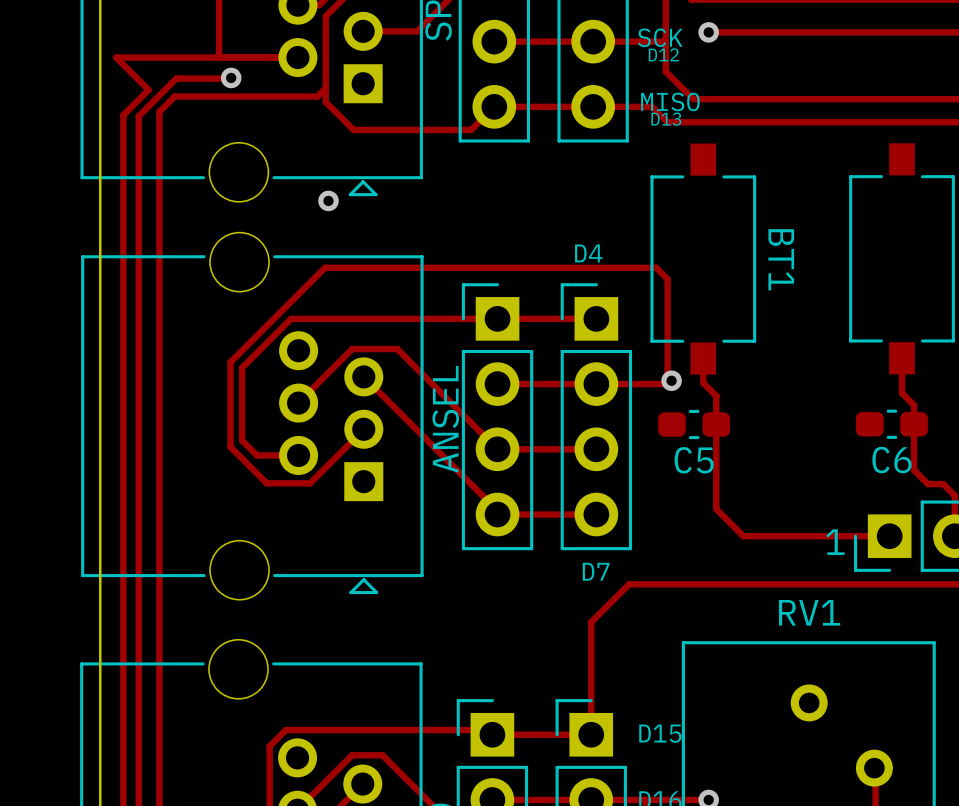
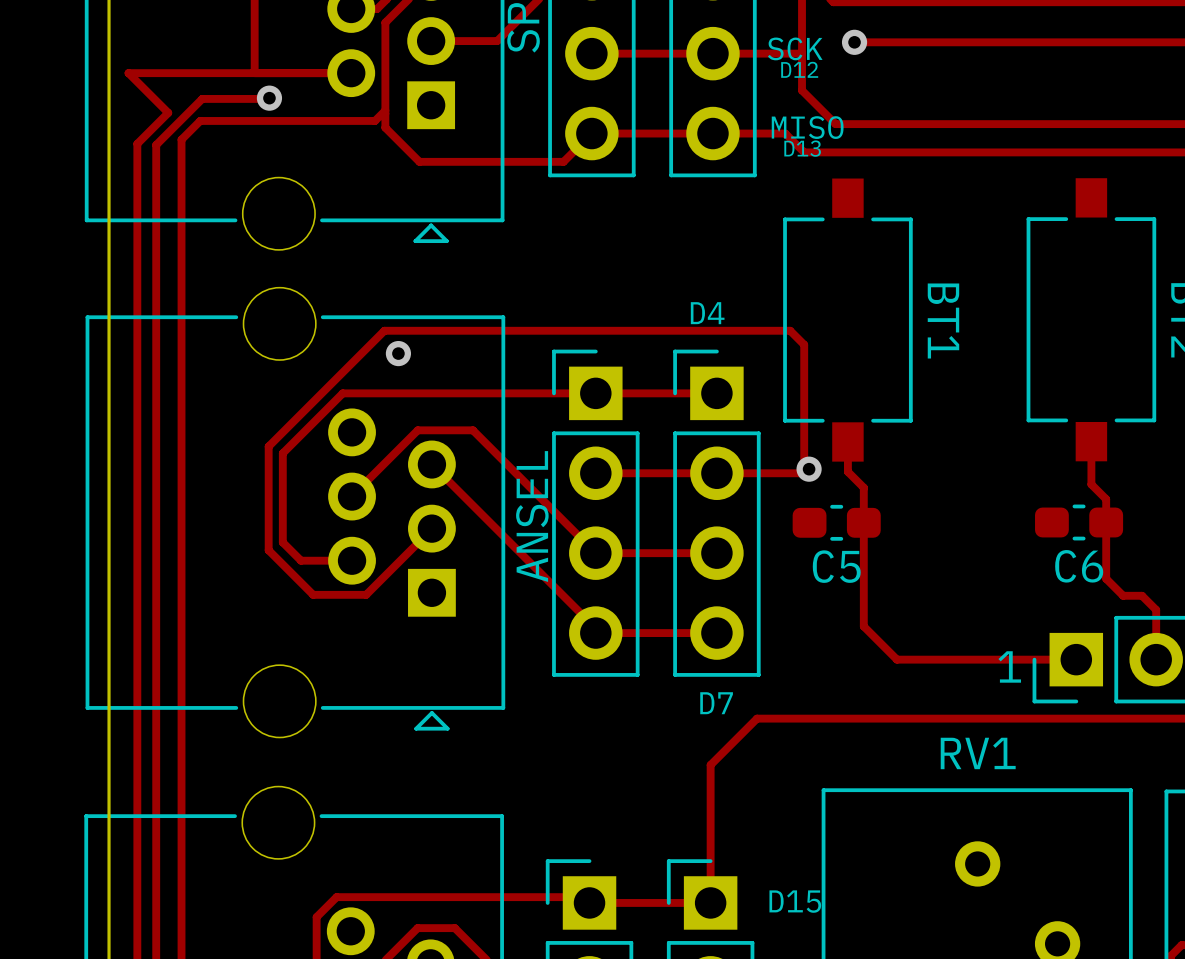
via position: (328, 200) -> (398, 353)

